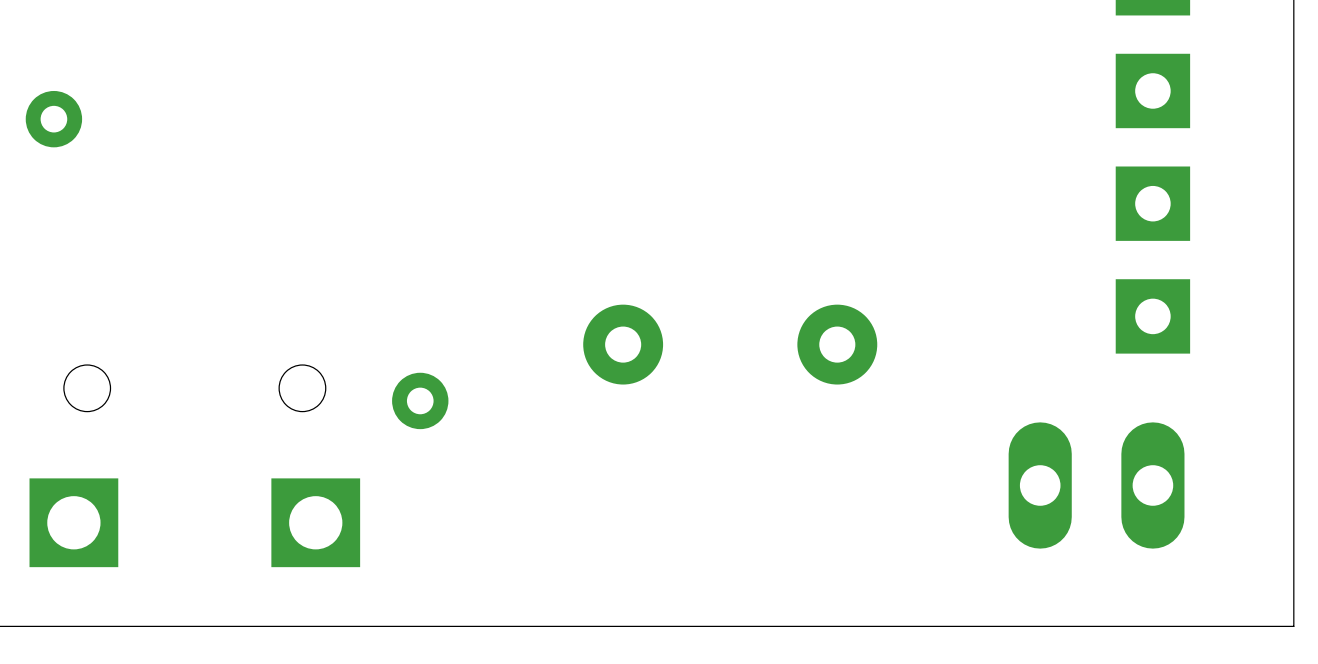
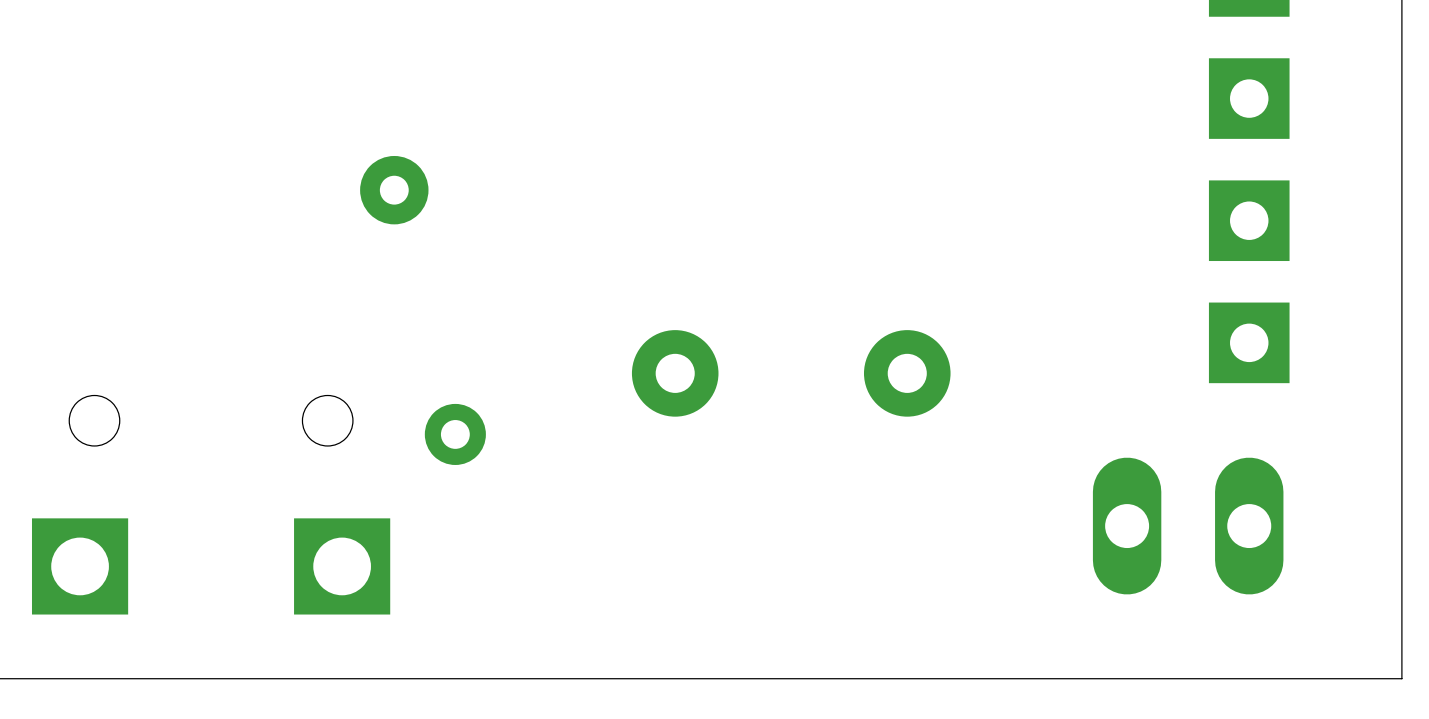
via: (53, 119) -> none
via: none -> (394, 190)

